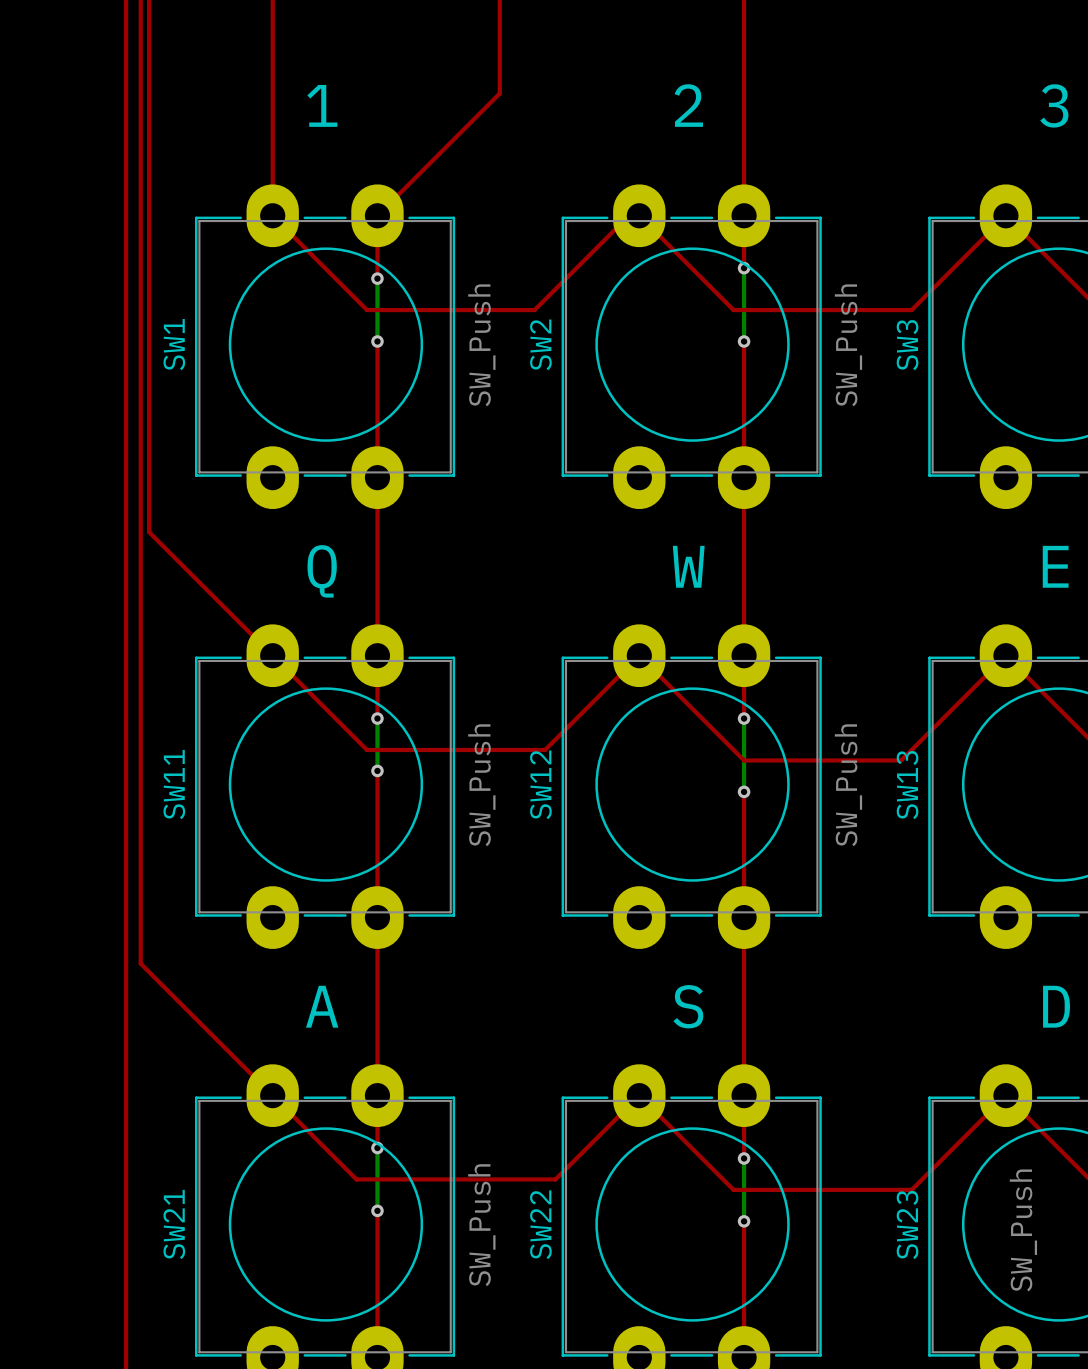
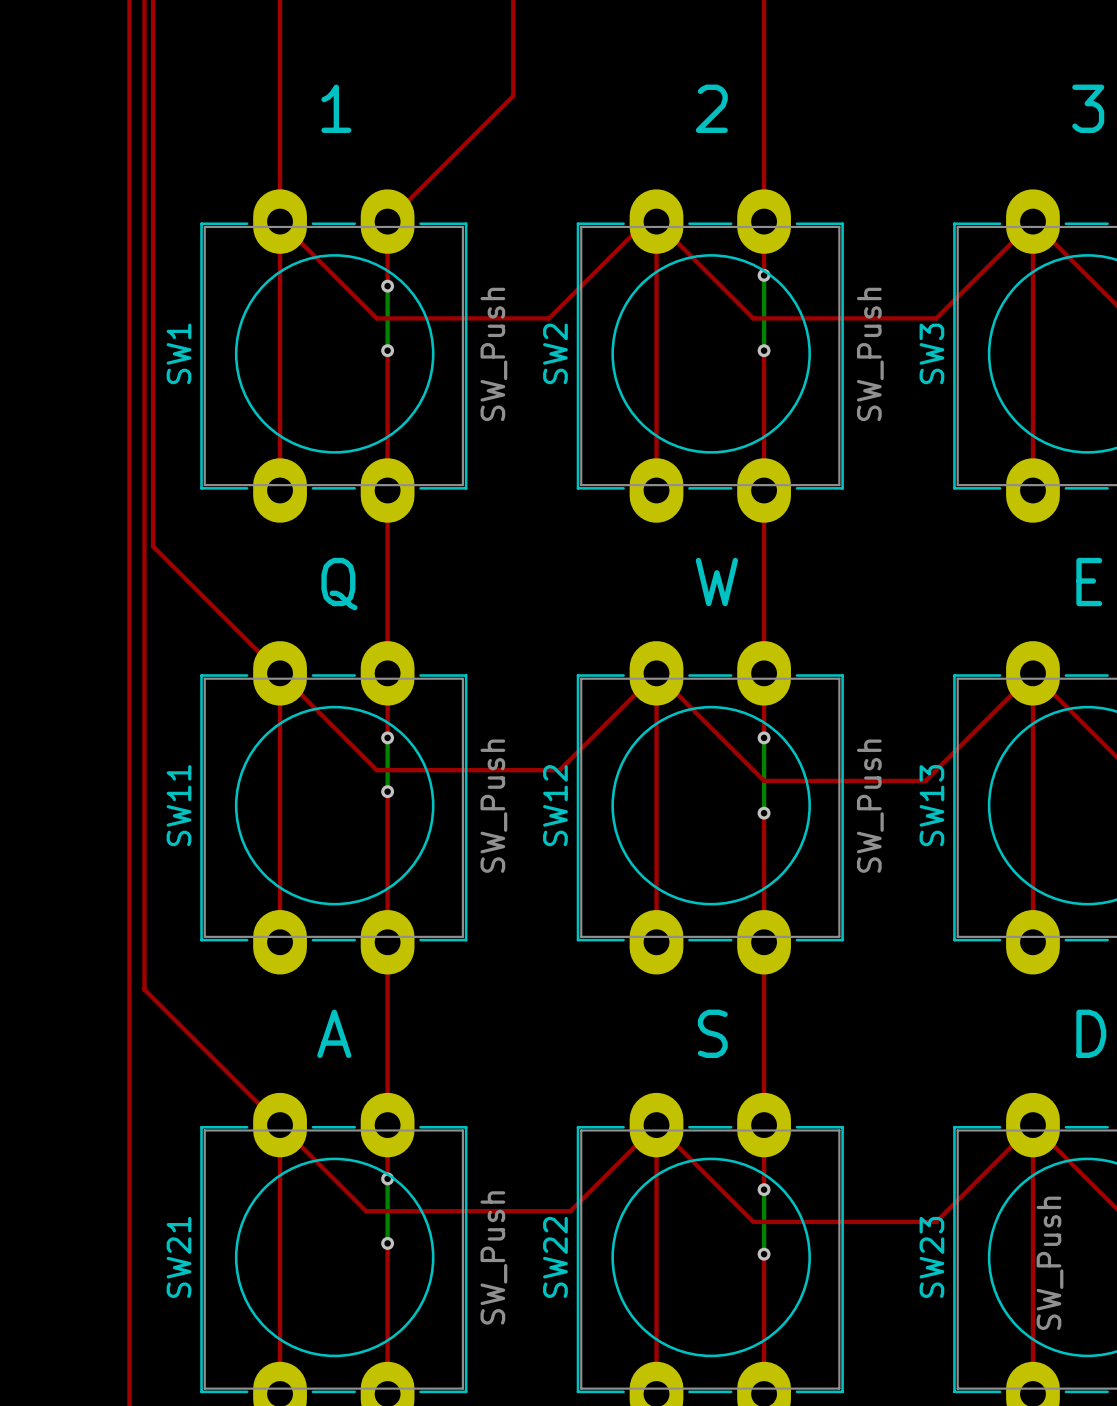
top track: none -> (280, 221) (280, 490)
top track: none -> (656, 221) (656, 490)
top track: none -> (1032, 221) (1032, 490)
top track: none -> (280, 673) (280, 942)
top track: none -> (656, 673) (656, 942)
top track: none -> (1032, 673) (1032, 942)
top track: none -> (280, 1125) (280, 1394)
top track: none -> (656, 1125) (656, 1394)
top track: none -> (1032, 1125) (1032, 1394)

